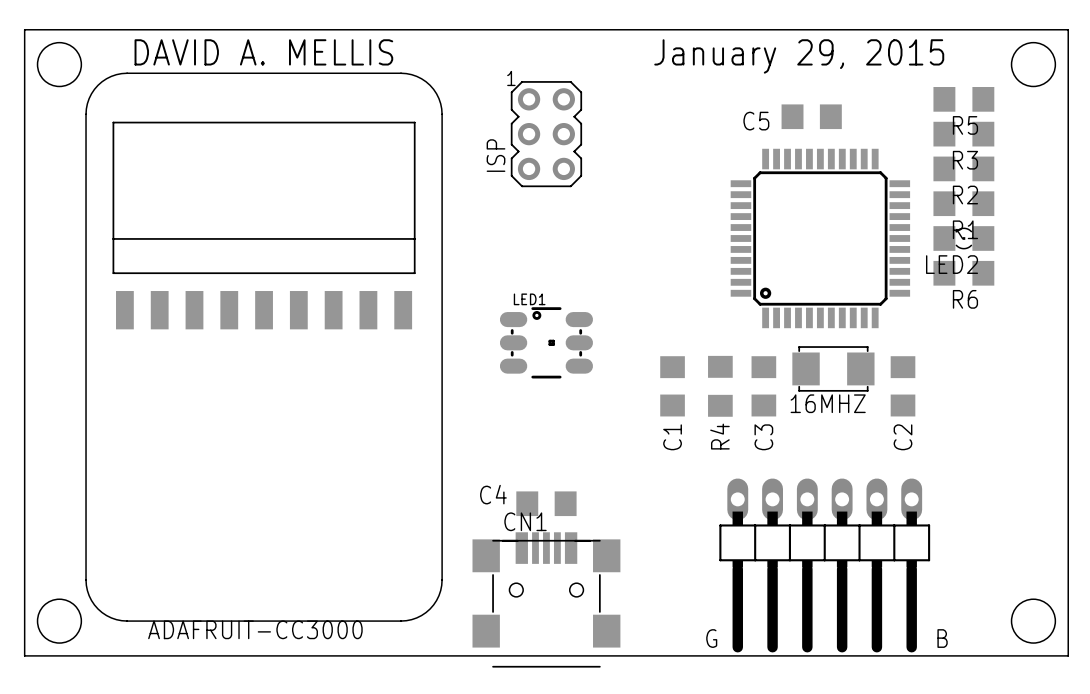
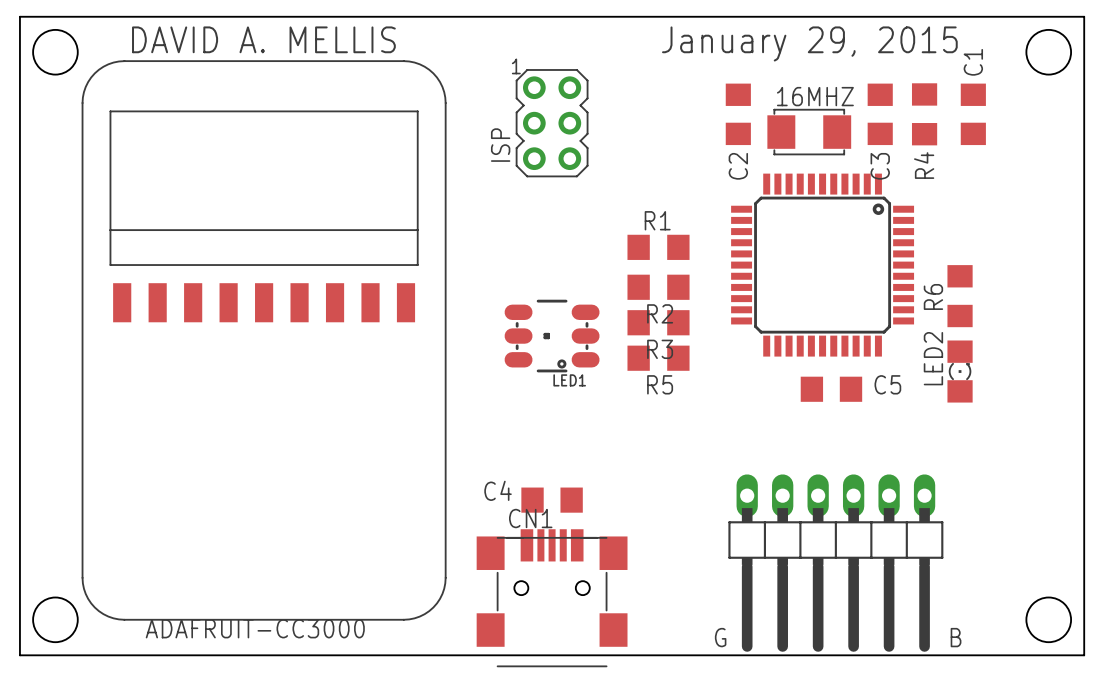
R5 position: (963, 99) -> (658, 358)
C5 position: (811, 116) -> (831, 389)
C5 name position: C5 (756, 121) -> C5 (887, 384)
R3 position: (963, 134) -> (658, 322)
R2 position: (963, 168) -> (658, 287)
R1 position: (963, 203) -> (658, 247)
R1 name position: R1 (965, 229) -> R1 (657, 220)
part rotation: 0° (820, 238) -> 180° (822, 265)
LED2 rotation: 0° (963, 238) -> 90° clockwise (960, 371)
LED2 position: (963, 238) -> (960, 371)
R6 rotation: 0° (963, 273) -> 90° clockwise (960, 296)
LED1 rotation: 0° (546, 342) -> 180° (552, 336)
16MHZ position: (833, 368) -> (809, 132)
C1 position: (672, 386) -> (973, 114)
R4 position: (720, 386) -> (924, 114)
C3 position: (763, 386) -> (880, 114)
C2 position: (903, 386) -> (738, 114)
16MHZ name position: 16MHZ (828, 403) -> 16MHZ (815, 96)
C1 name position: C1 (672, 437) -> C1 (973, 62)

